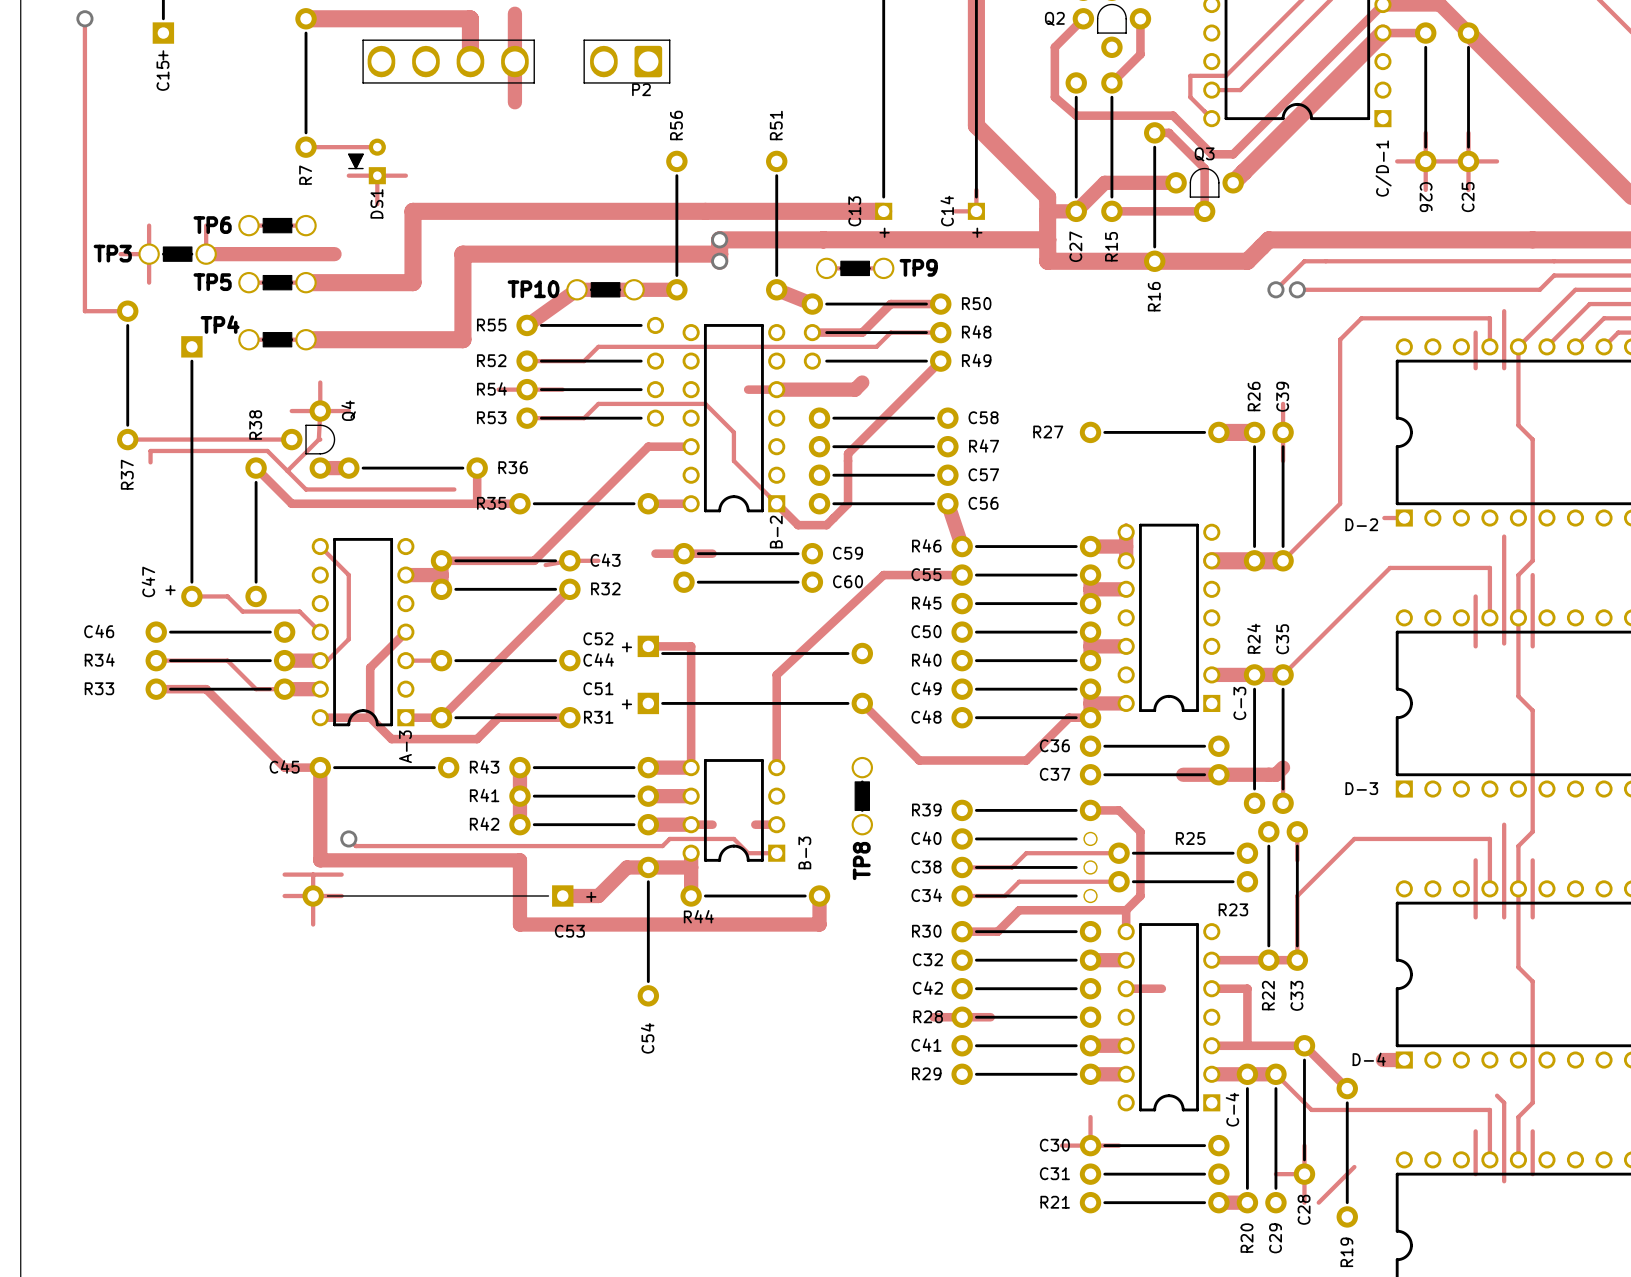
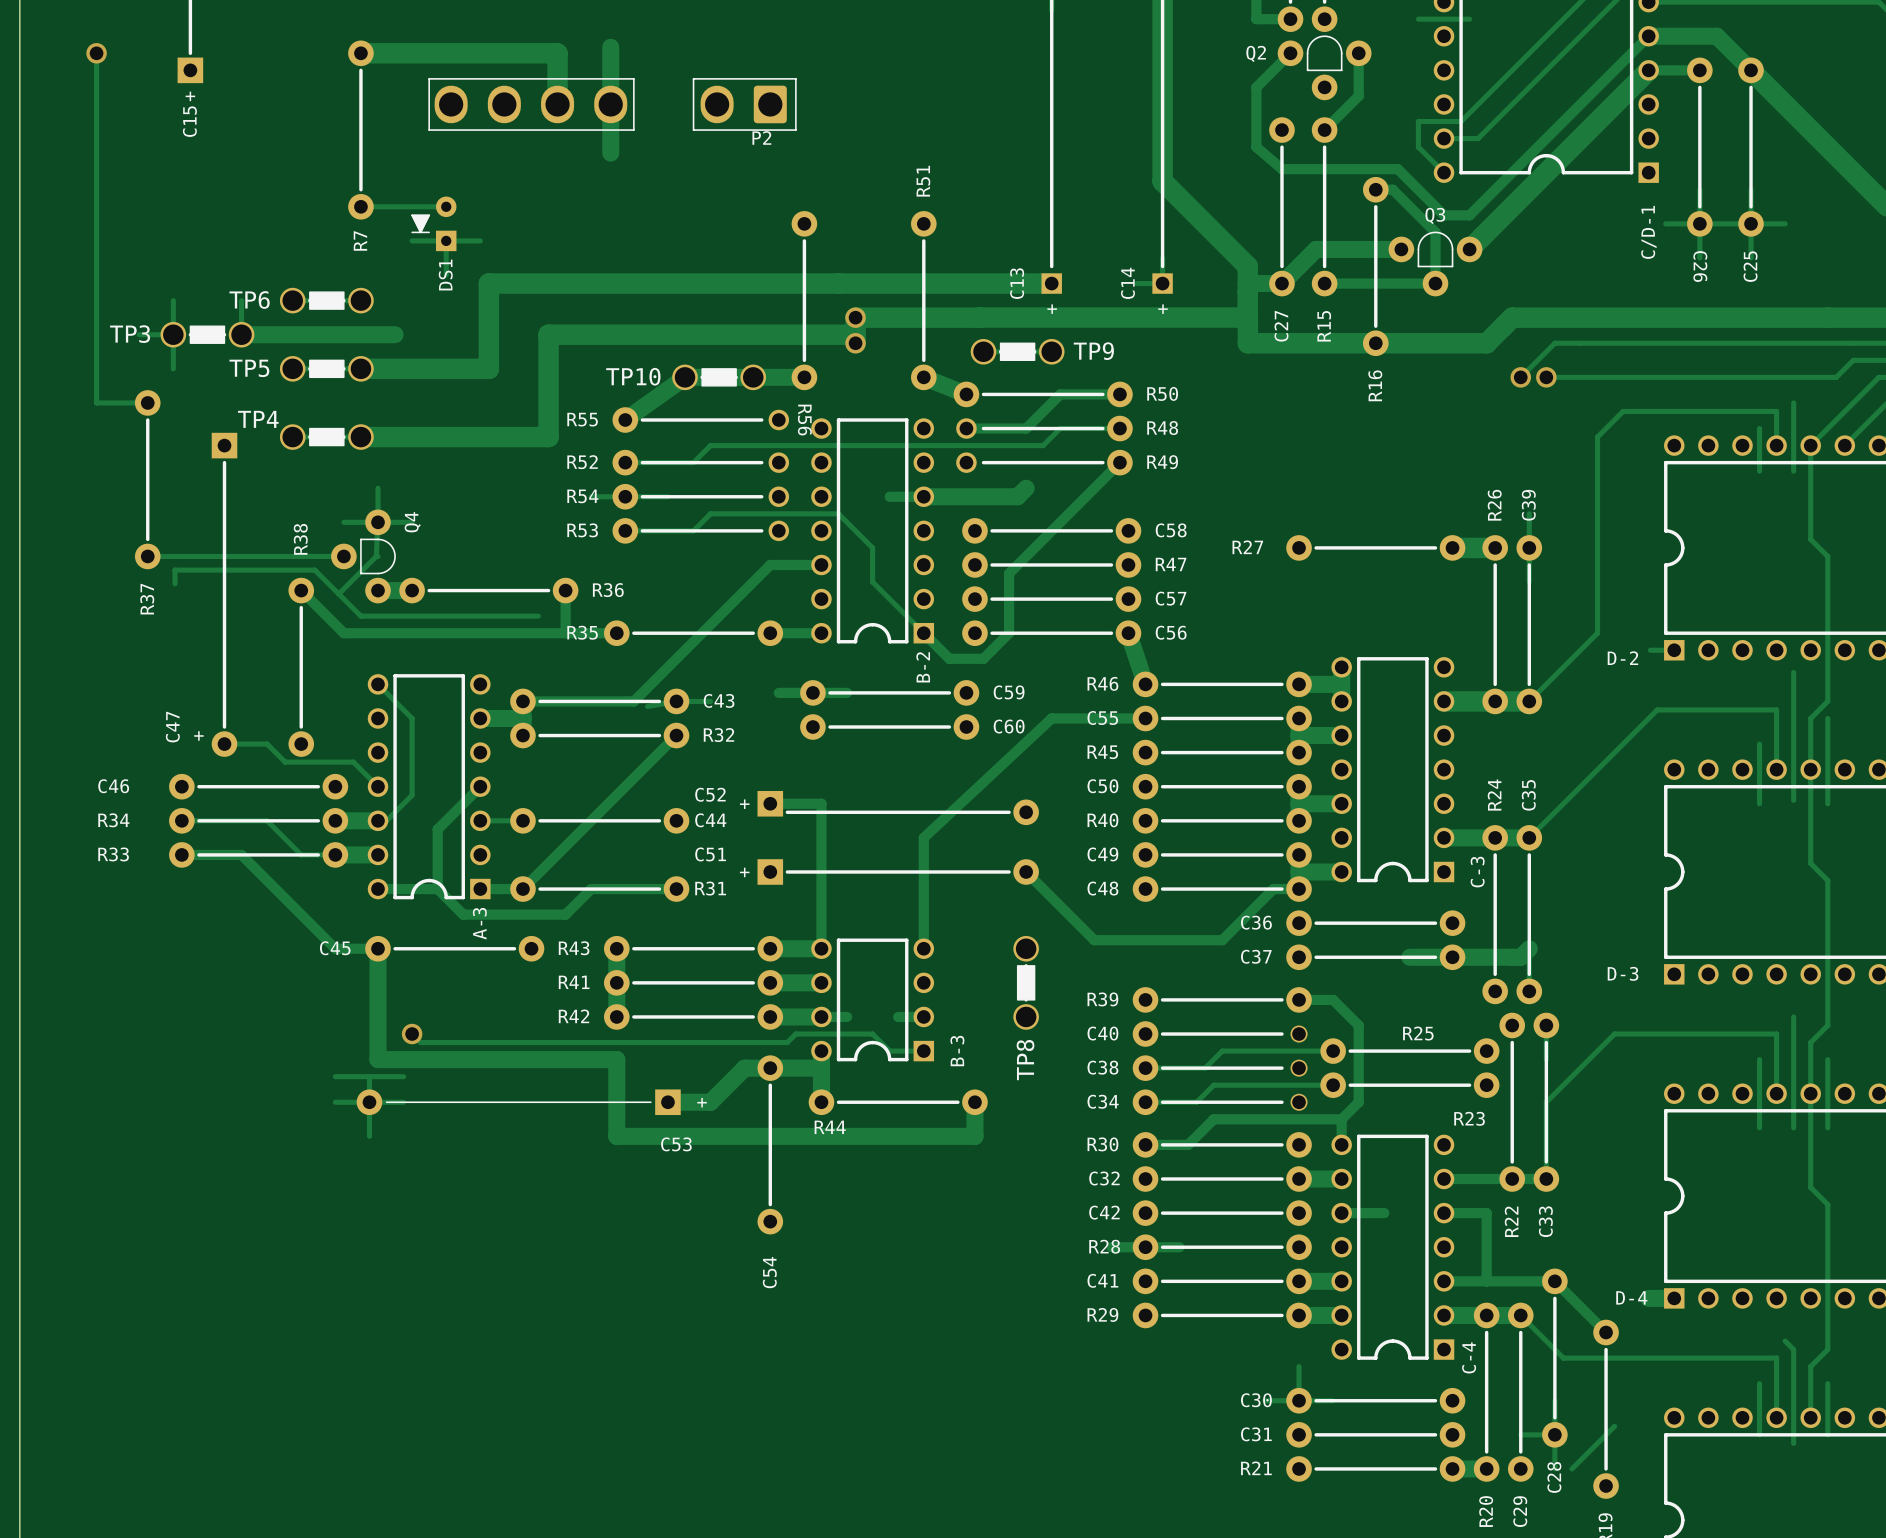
R56 name rotation: 0° (676, 125) -> 180° (804, 420)
R56 name position: R56 (676, 125) -> R56 (804, 420)

